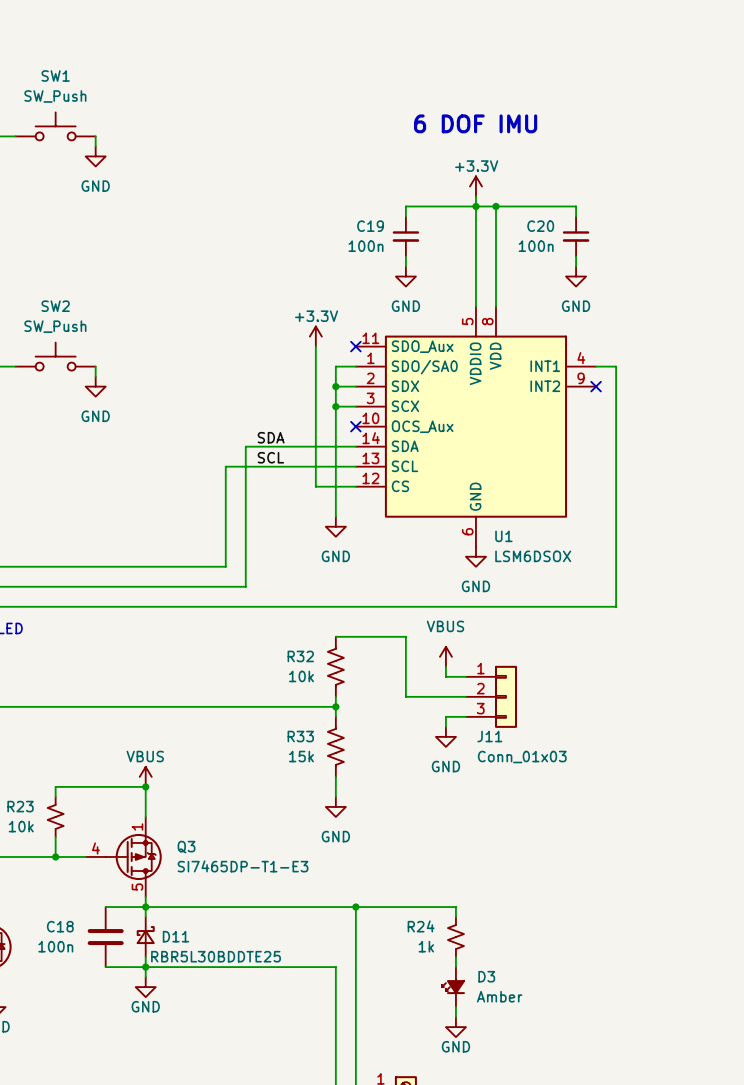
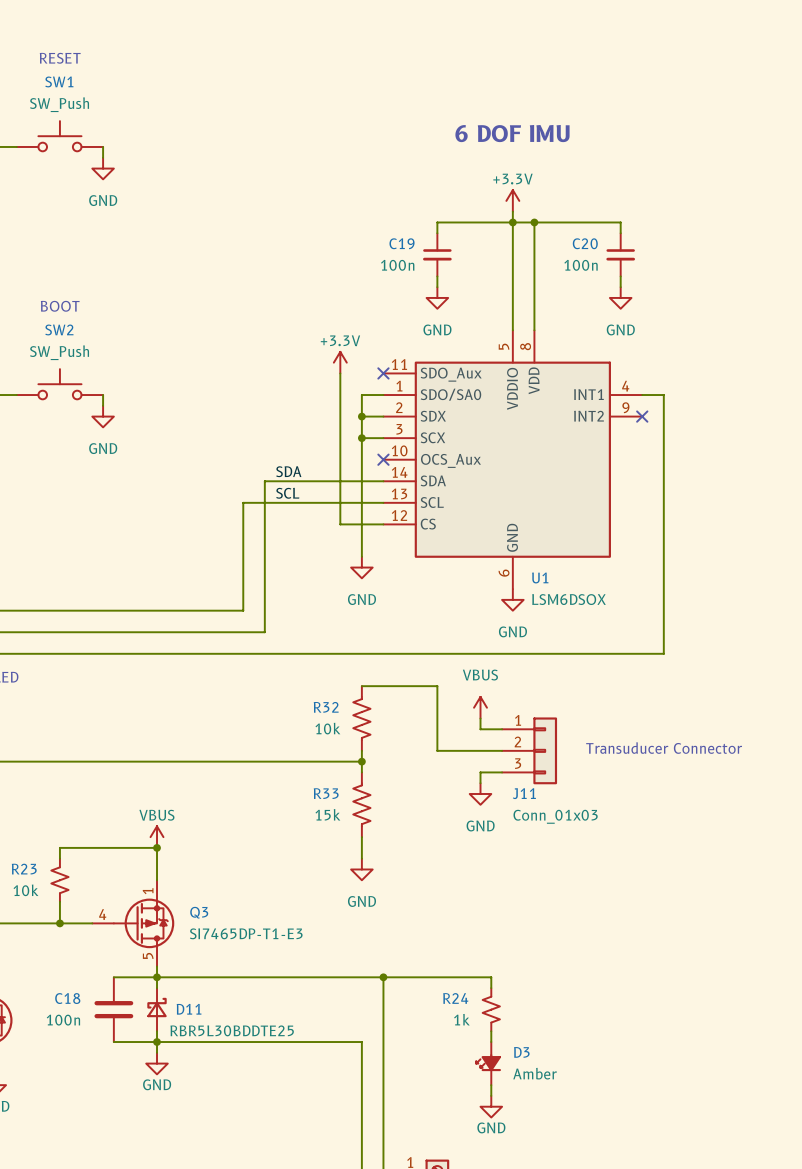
text: none -> RESET (60, 58)
text: none -> BOOT (60, 306)
text: none -> Transuducer Connector (664, 748)

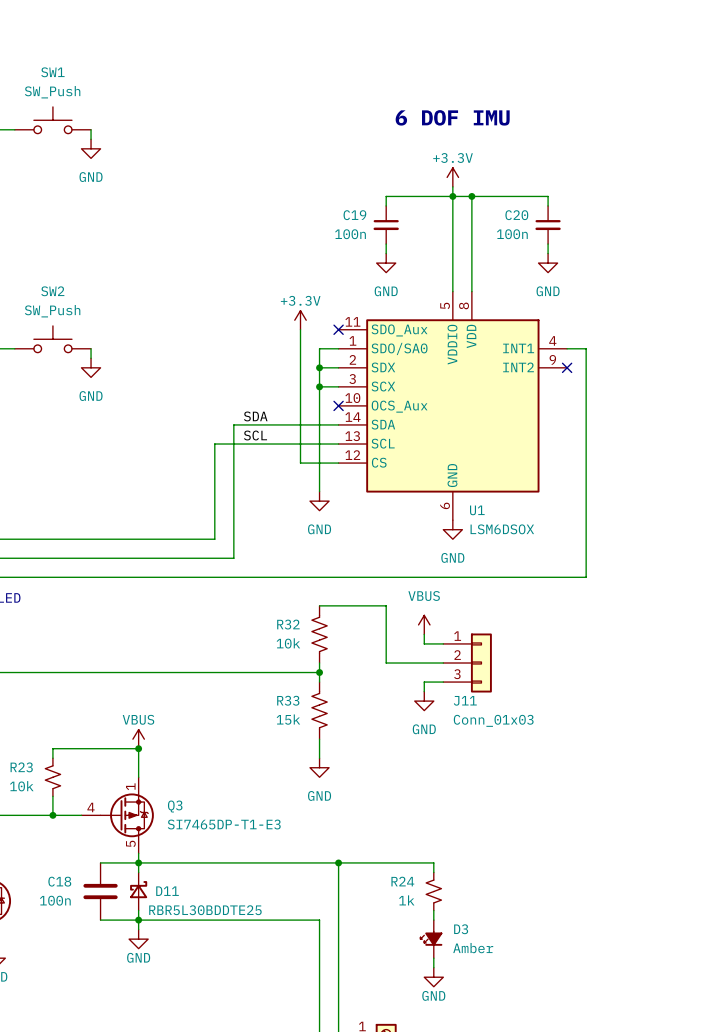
text: RESET (60, 58) -> none
text: BOOT (60, 306) -> none
text: Transuducer Connector (664, 748) -> none

